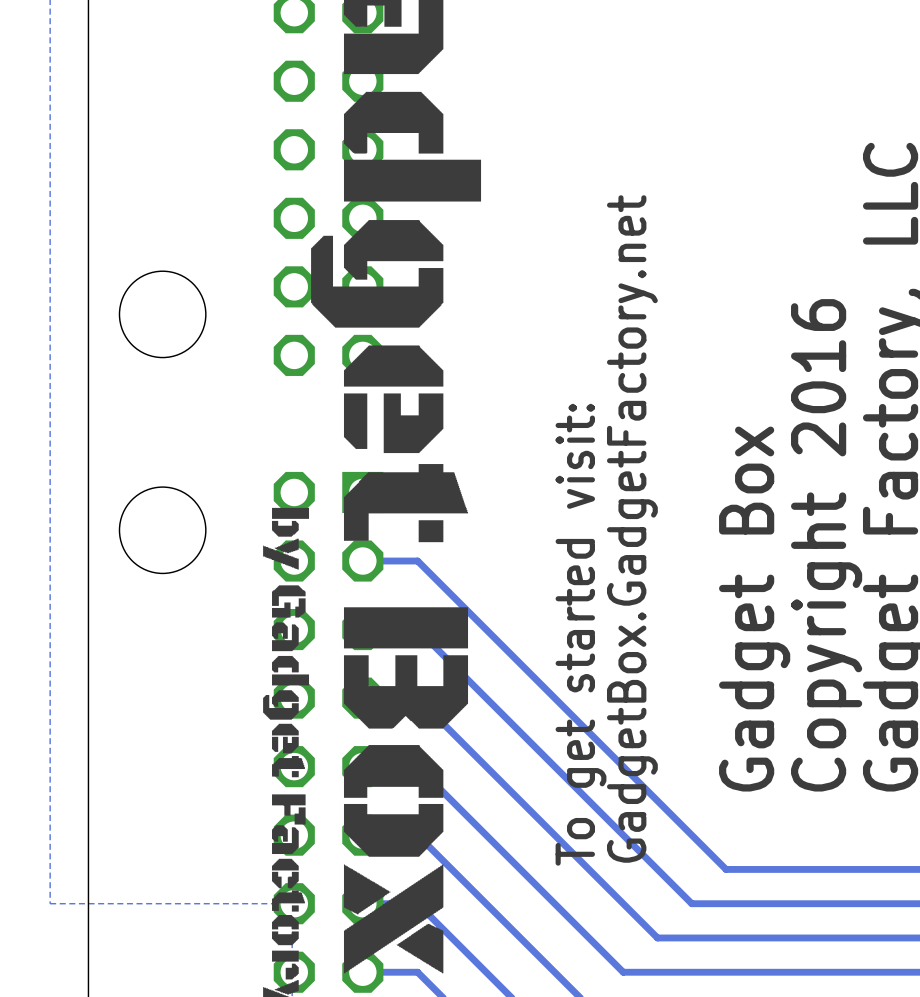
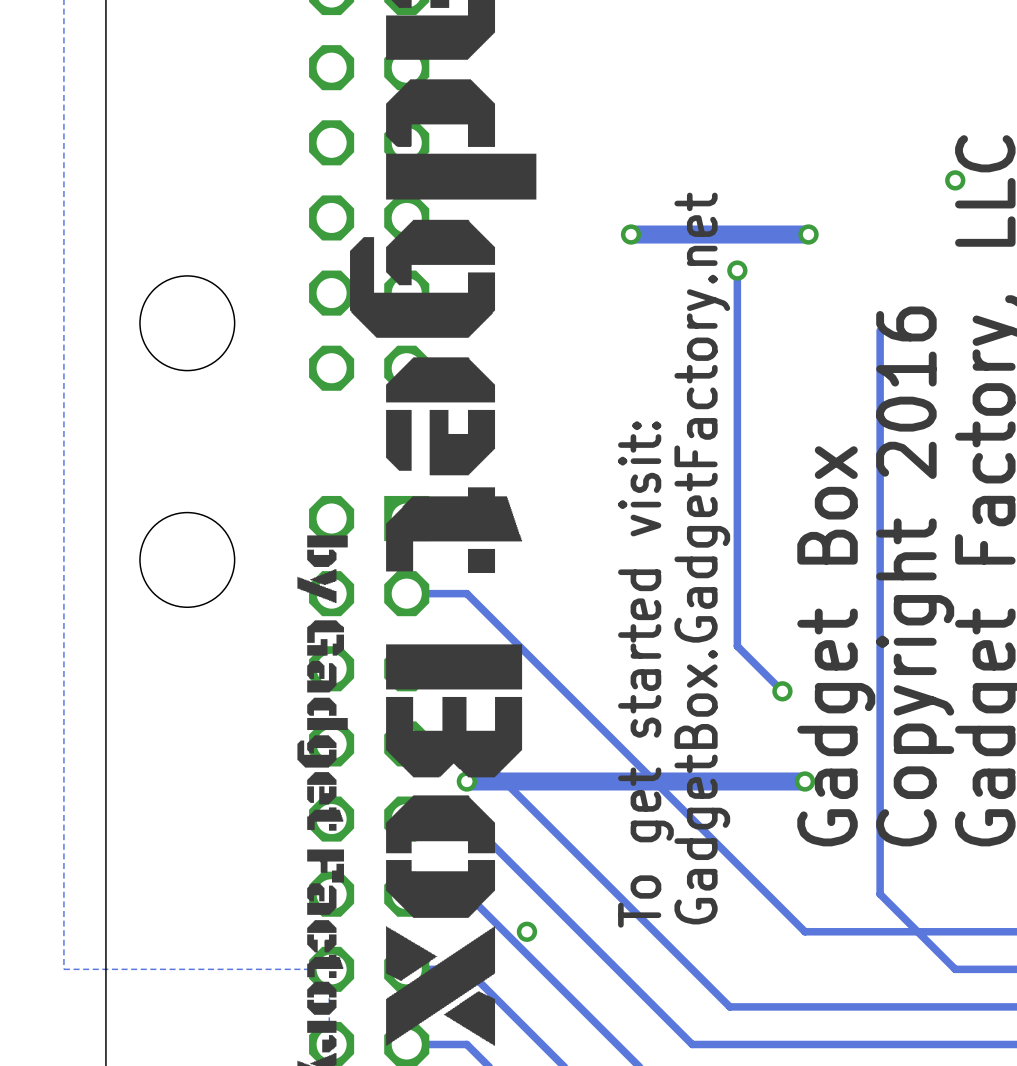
via: none -> (955, 180)
via: none -> (631, 234)
track: none -> (808, 234) (631, 234)
via: none -> (808, 234)
track: none -> (737, 270) (737, 646) (782, 691)
via: none -> (737, 270)
track: (362, 629) (417, 629) (691, 903) (863, 903) -> (880, 330) (880, 894) (955, 969)
via: none -> (782, 691)
via: none -> (466, 781)
track: none -> (804, 781) (466, 781)
via: none -> (804, 781)
via: none -> (526, 931)

